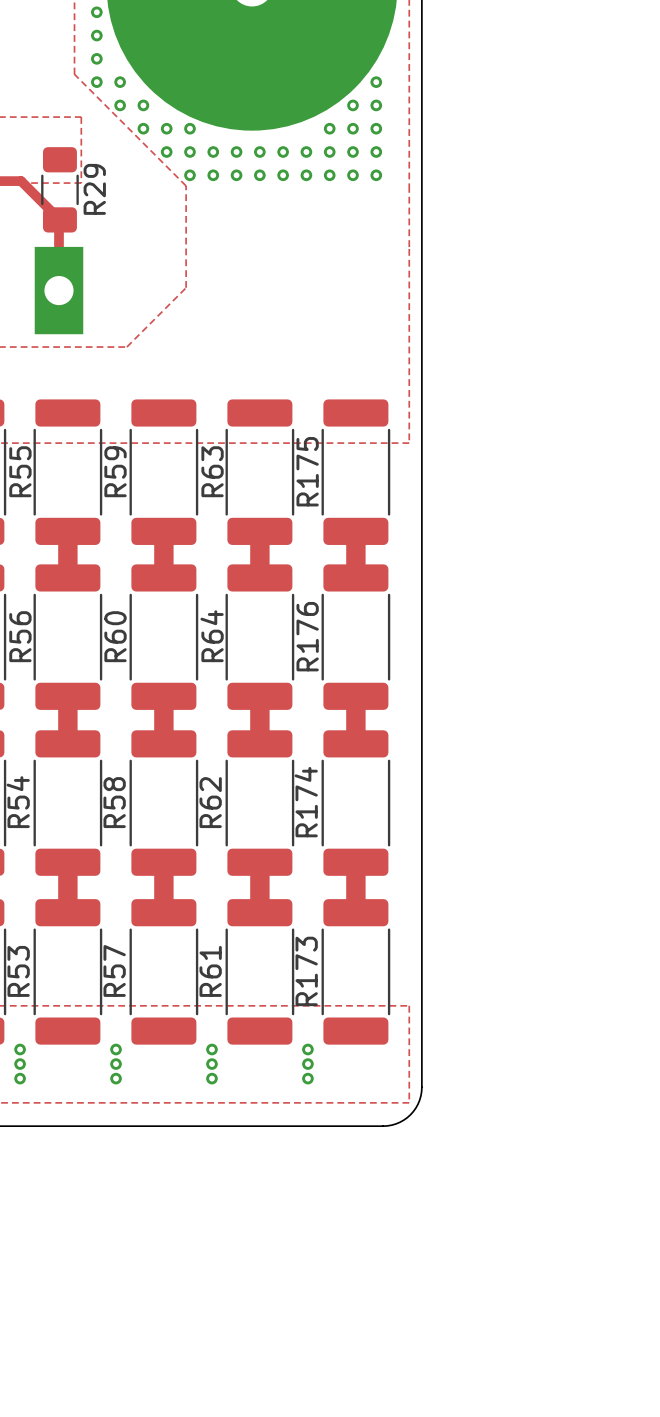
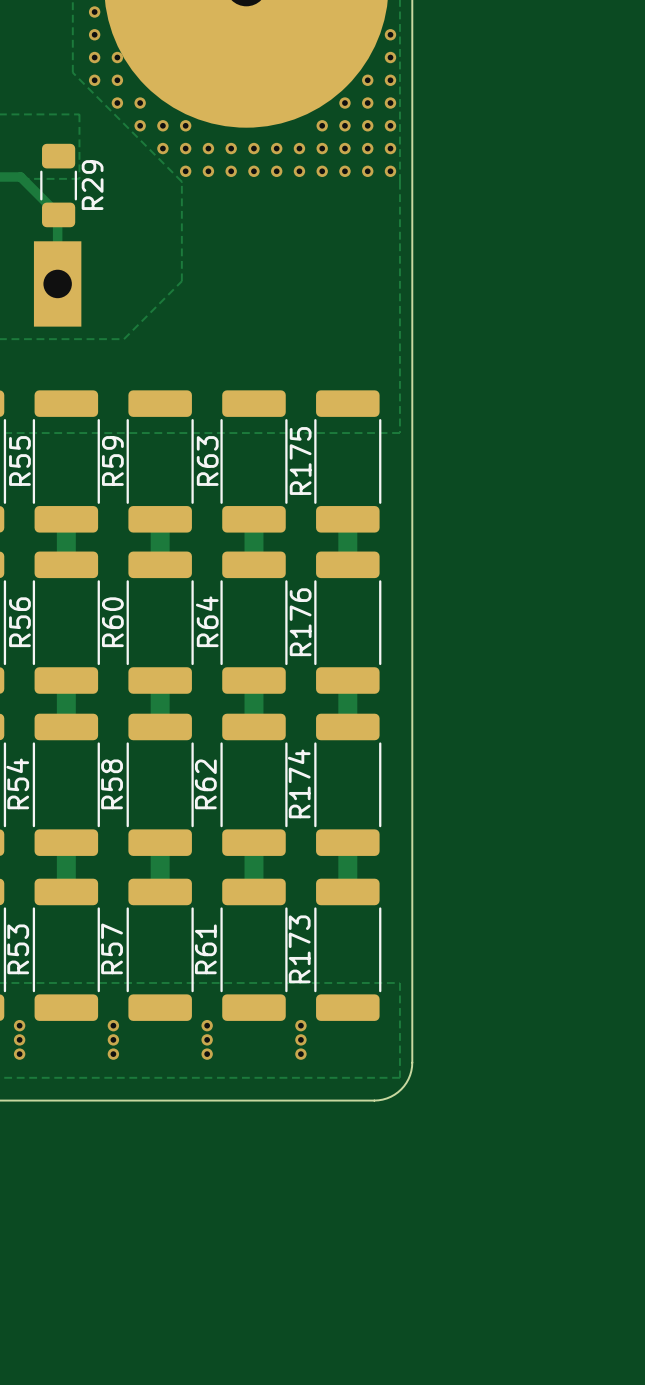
via: none -> (390, 34)
via: none -> (117, 57)
via: none -> (390, 57)
via: none -> (390, 80)
via: none -> (390, 103)
via: none -> (390, 125)
via: none -> (390, 148)
via: none -> (390, 171)

